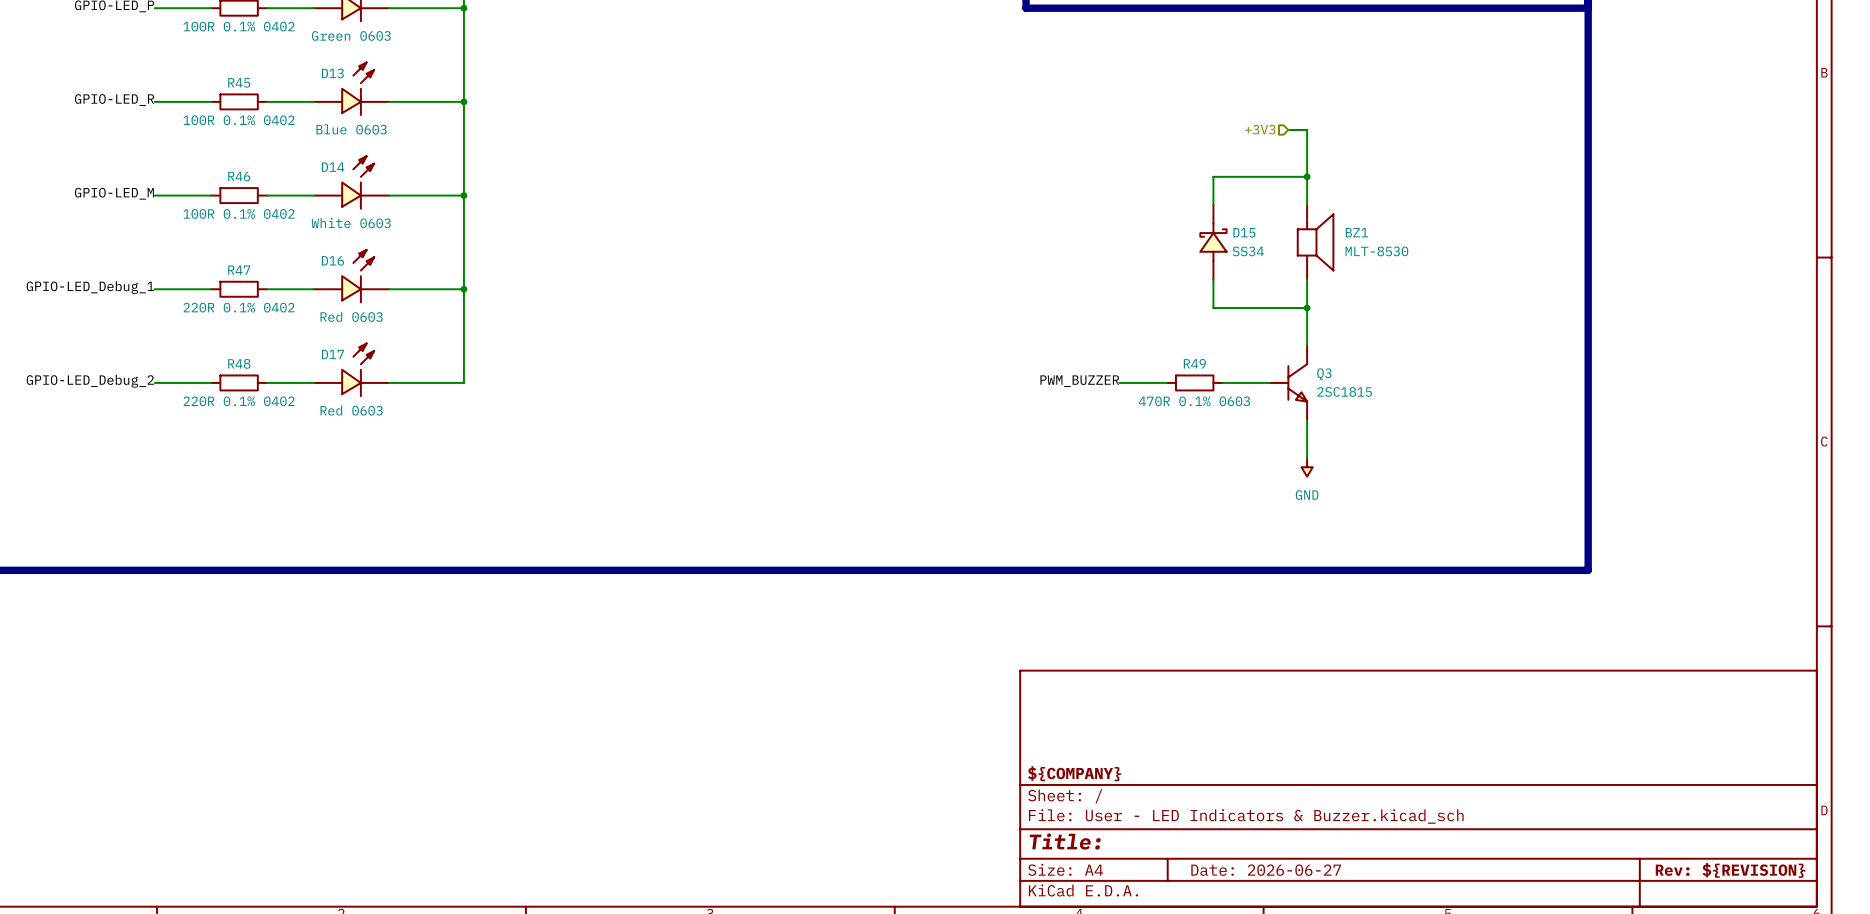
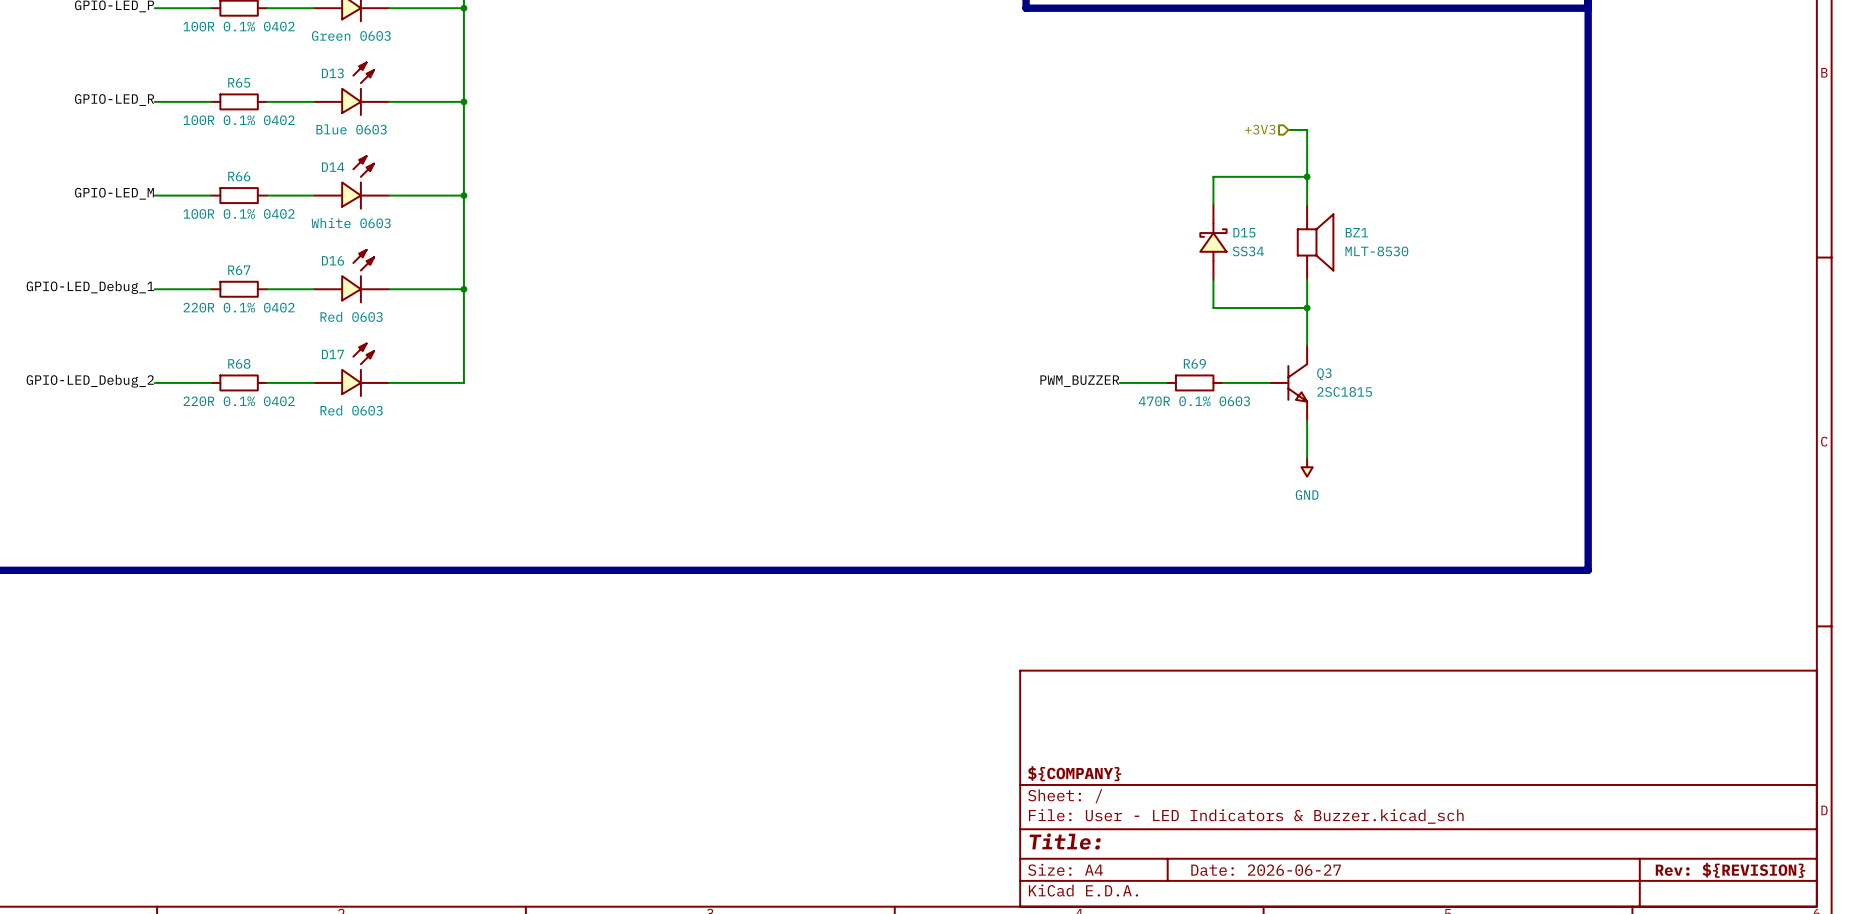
R45 name: R45 (239, 82) -> R65 (239, 82)
R46 name: R46 (239, 176) -> R66 (239, 176)
R47 name: R47 (239, 270) -> R67 (239, 270)
R48 name: R48 (239, 363) -> R68 (239, 363)
R49 name: R49 (1194, 363) -> R69 (1194, 363)

